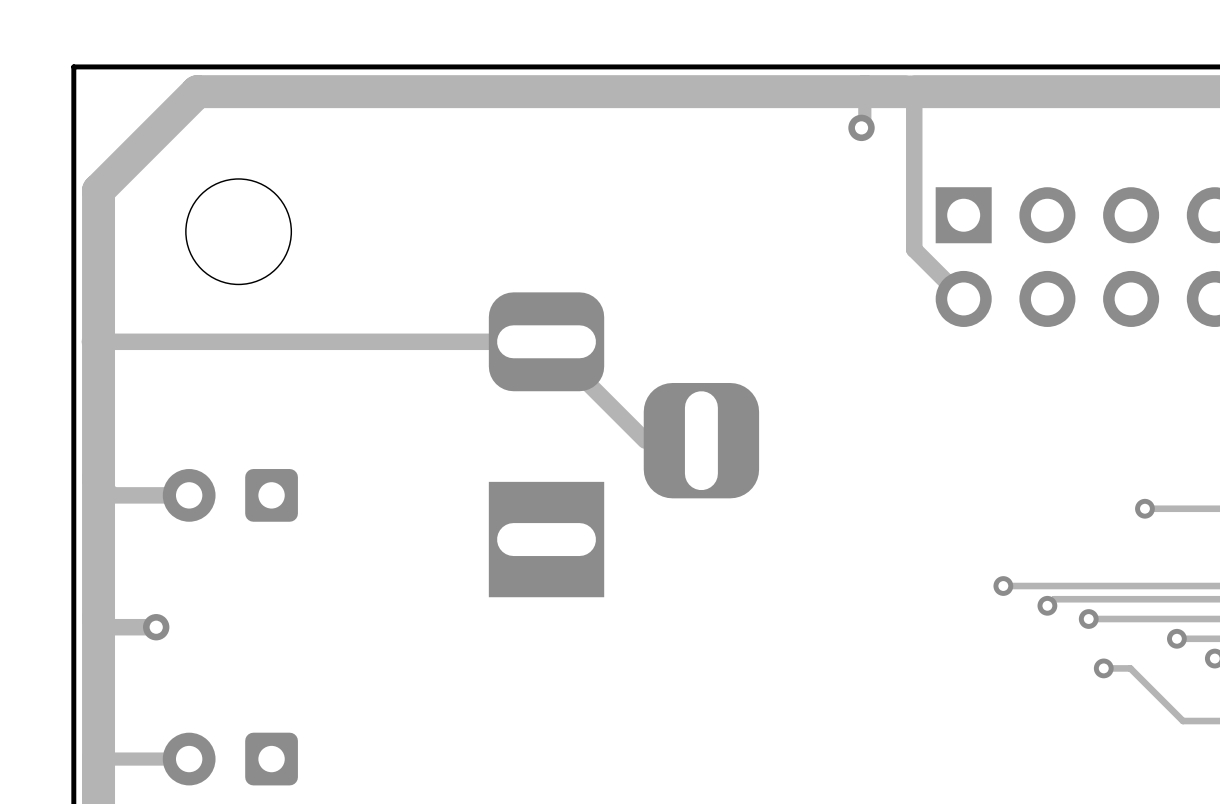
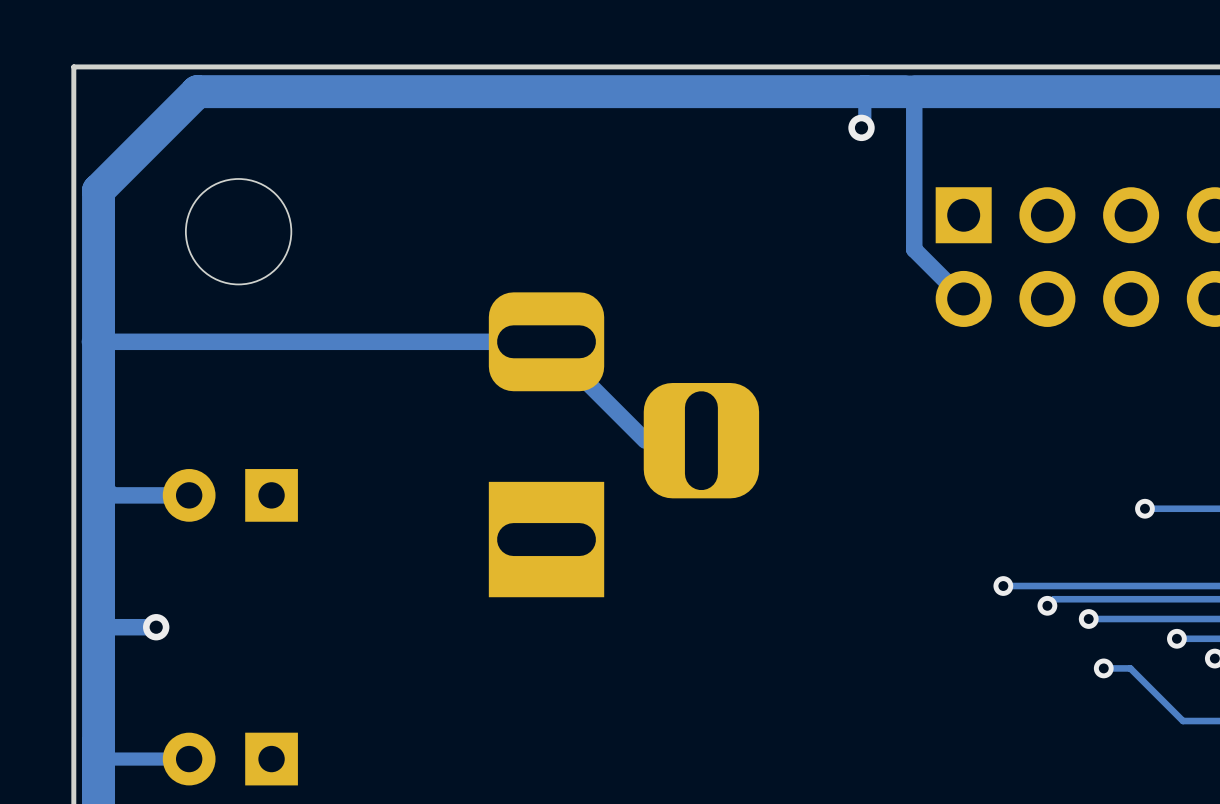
part footprint: [162, 469, 298, 522] -> [162, 469, 298, 522]
part footprint: [162, 732, 298, 786] -> [162, 732, 298, 786]

